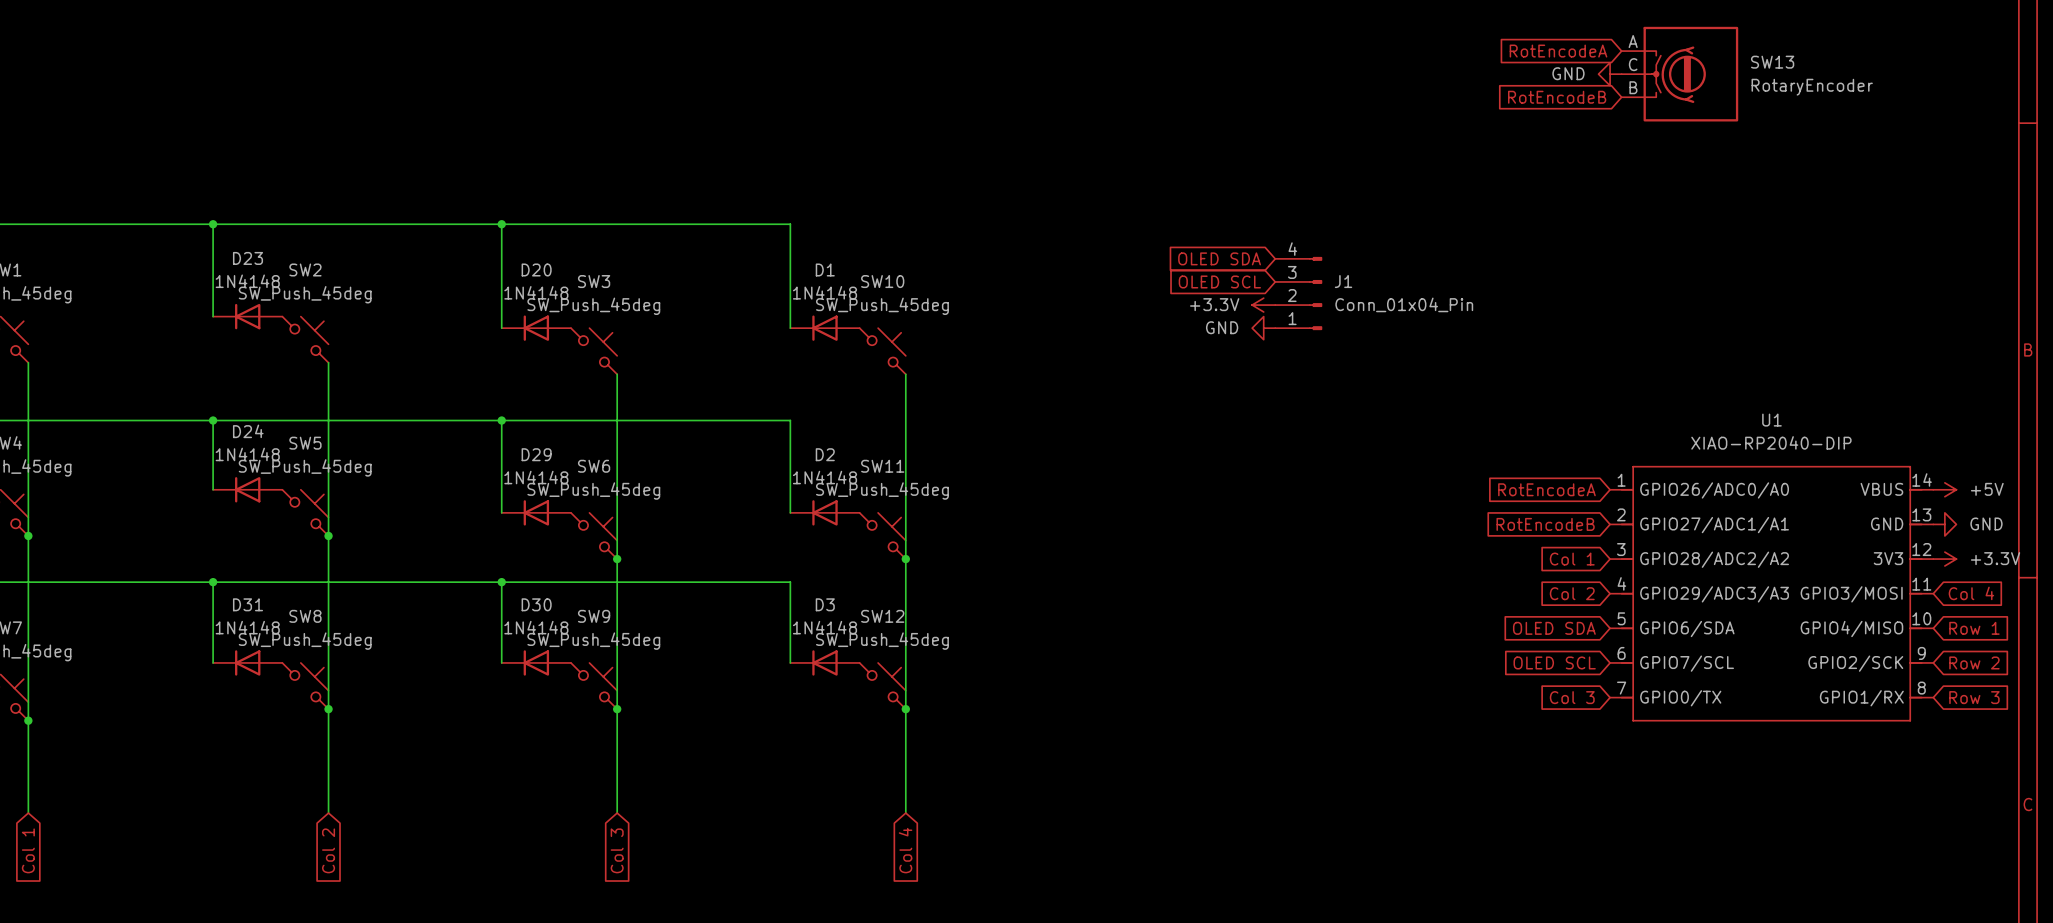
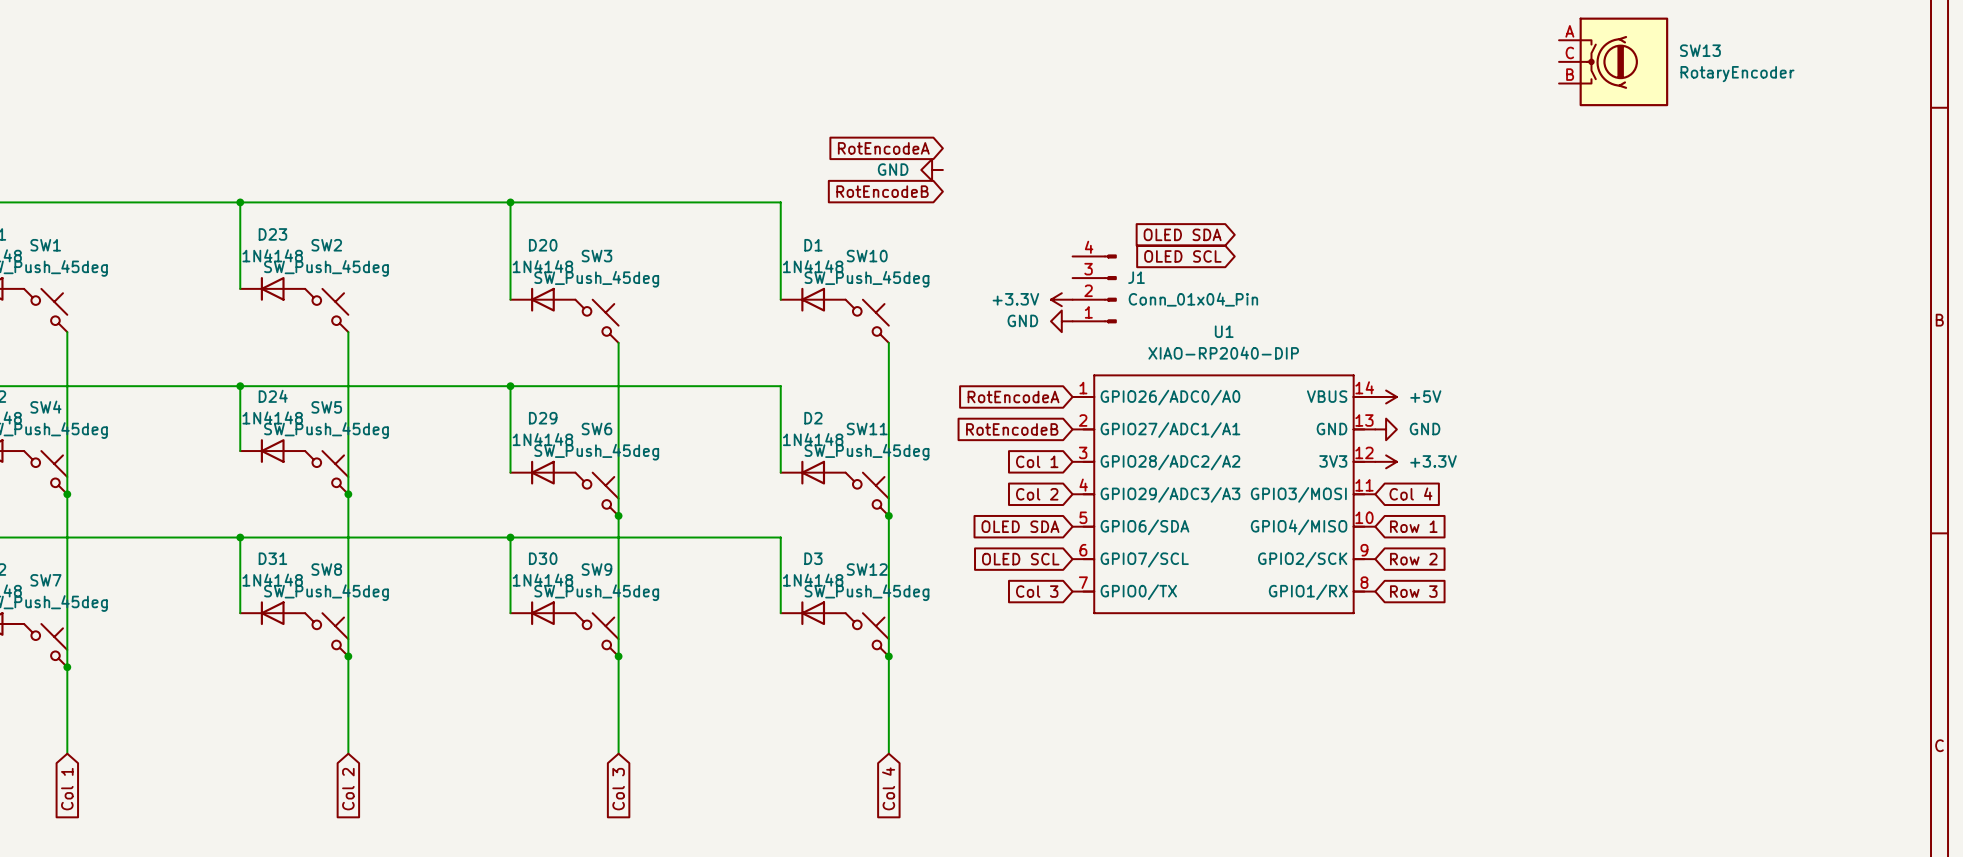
global label: RotEncodeA (1558, 51) -> none
power symbol: GND (1610, 74) -> none
global label: RotEncodeB (1557, 97) -> none
global label: none -> RotEncodeA (883, 148)
power symbol: none -> GND (932, 169)
global label: none -> RotEncodeB (882, 191)
J1 position: (1298, 293) -> (1094, 288)
power symbol: +3.3V (1263, 305) -> none
power symbol: none -> +3.3V (1061, 299)
power symbol: GND (1263, 328) -> none
power symbol: none -> GND (1061, 321)
global label: none -> RotEncodeA (1013, 396)
power symbol: none -> +5V (1386, 396)
global label: none -> RotEncodeB (1012, 429)
power symbol: none -> GND (1386, 429)
global label: RotEncodeA (1546, 489) -> none
power symbol: +5V (1944, 489) -> none
global label: none -> Col 1 (1037, 461)
power symbol: none -> +3.3V (1386, 461)
global label: RotEncodeB (1545, 524) -> none
power symbol: GND (1944, 524) -> none
global label: none -> Col 2 (1037, 494)
global label: none -> Col 4 (1410, 494)
global label: Col 1 (1572, 559) -> none
power symbol: +3.3V (1944, 559) -> none
global label: none -> OLED SDA (1020, 526)
global label: none -> Row 1 (1413, 526)
global label: Col 2 (1572, 593) -> none
U1 position: (1771, 593) -> (1223, 494)
global label: Col 4 (1971, 593) -> none
global label: none -> OLED SCL (1020, 559)
global label: none -> Row 2 (1413, 559)
global label: OLED SDA (1554, 628) -> none
global label: Row 1 (1974, 628) -> none
global label: none -> Col 3 (1037, 591)
global label: none -> Row 3 (1413, 591)
global label: OLED SCL (1554, 662) -> none
global label: Row 2 (1974, 662) -> none
global label: Col 3 (1572, 697) -> none
global label: Row 3 (1974, 697) -> none

